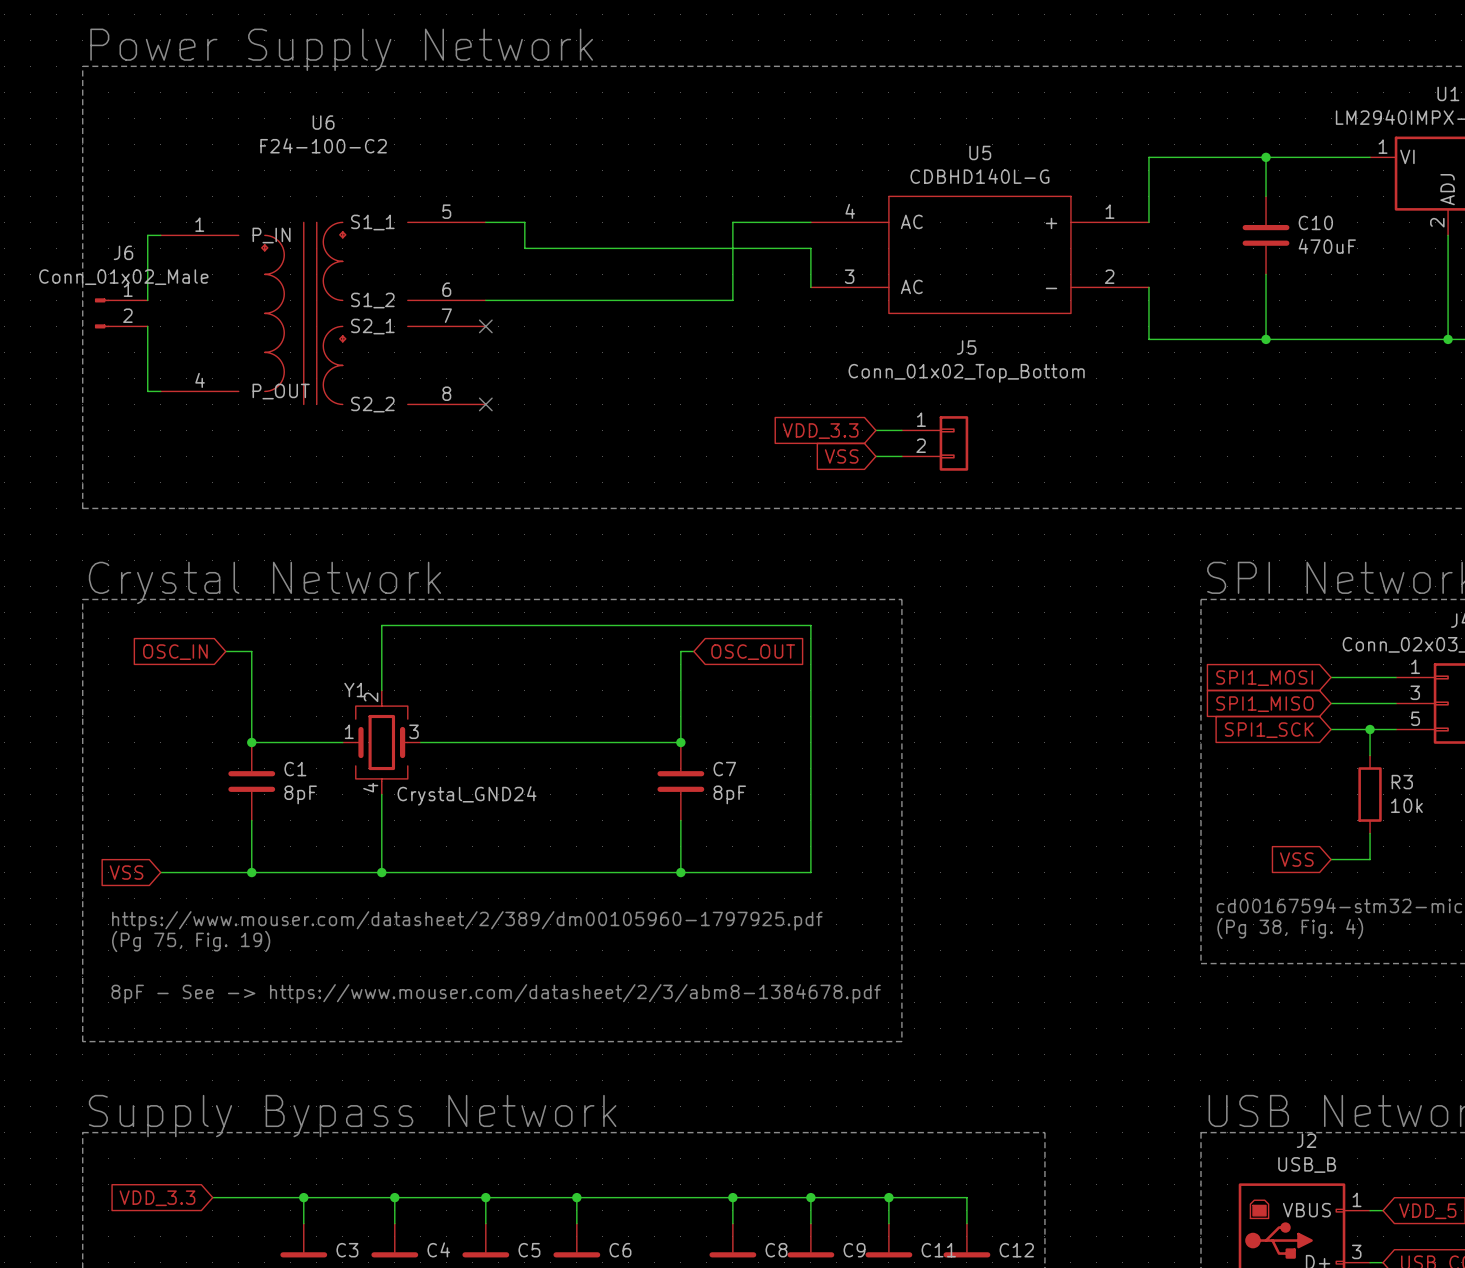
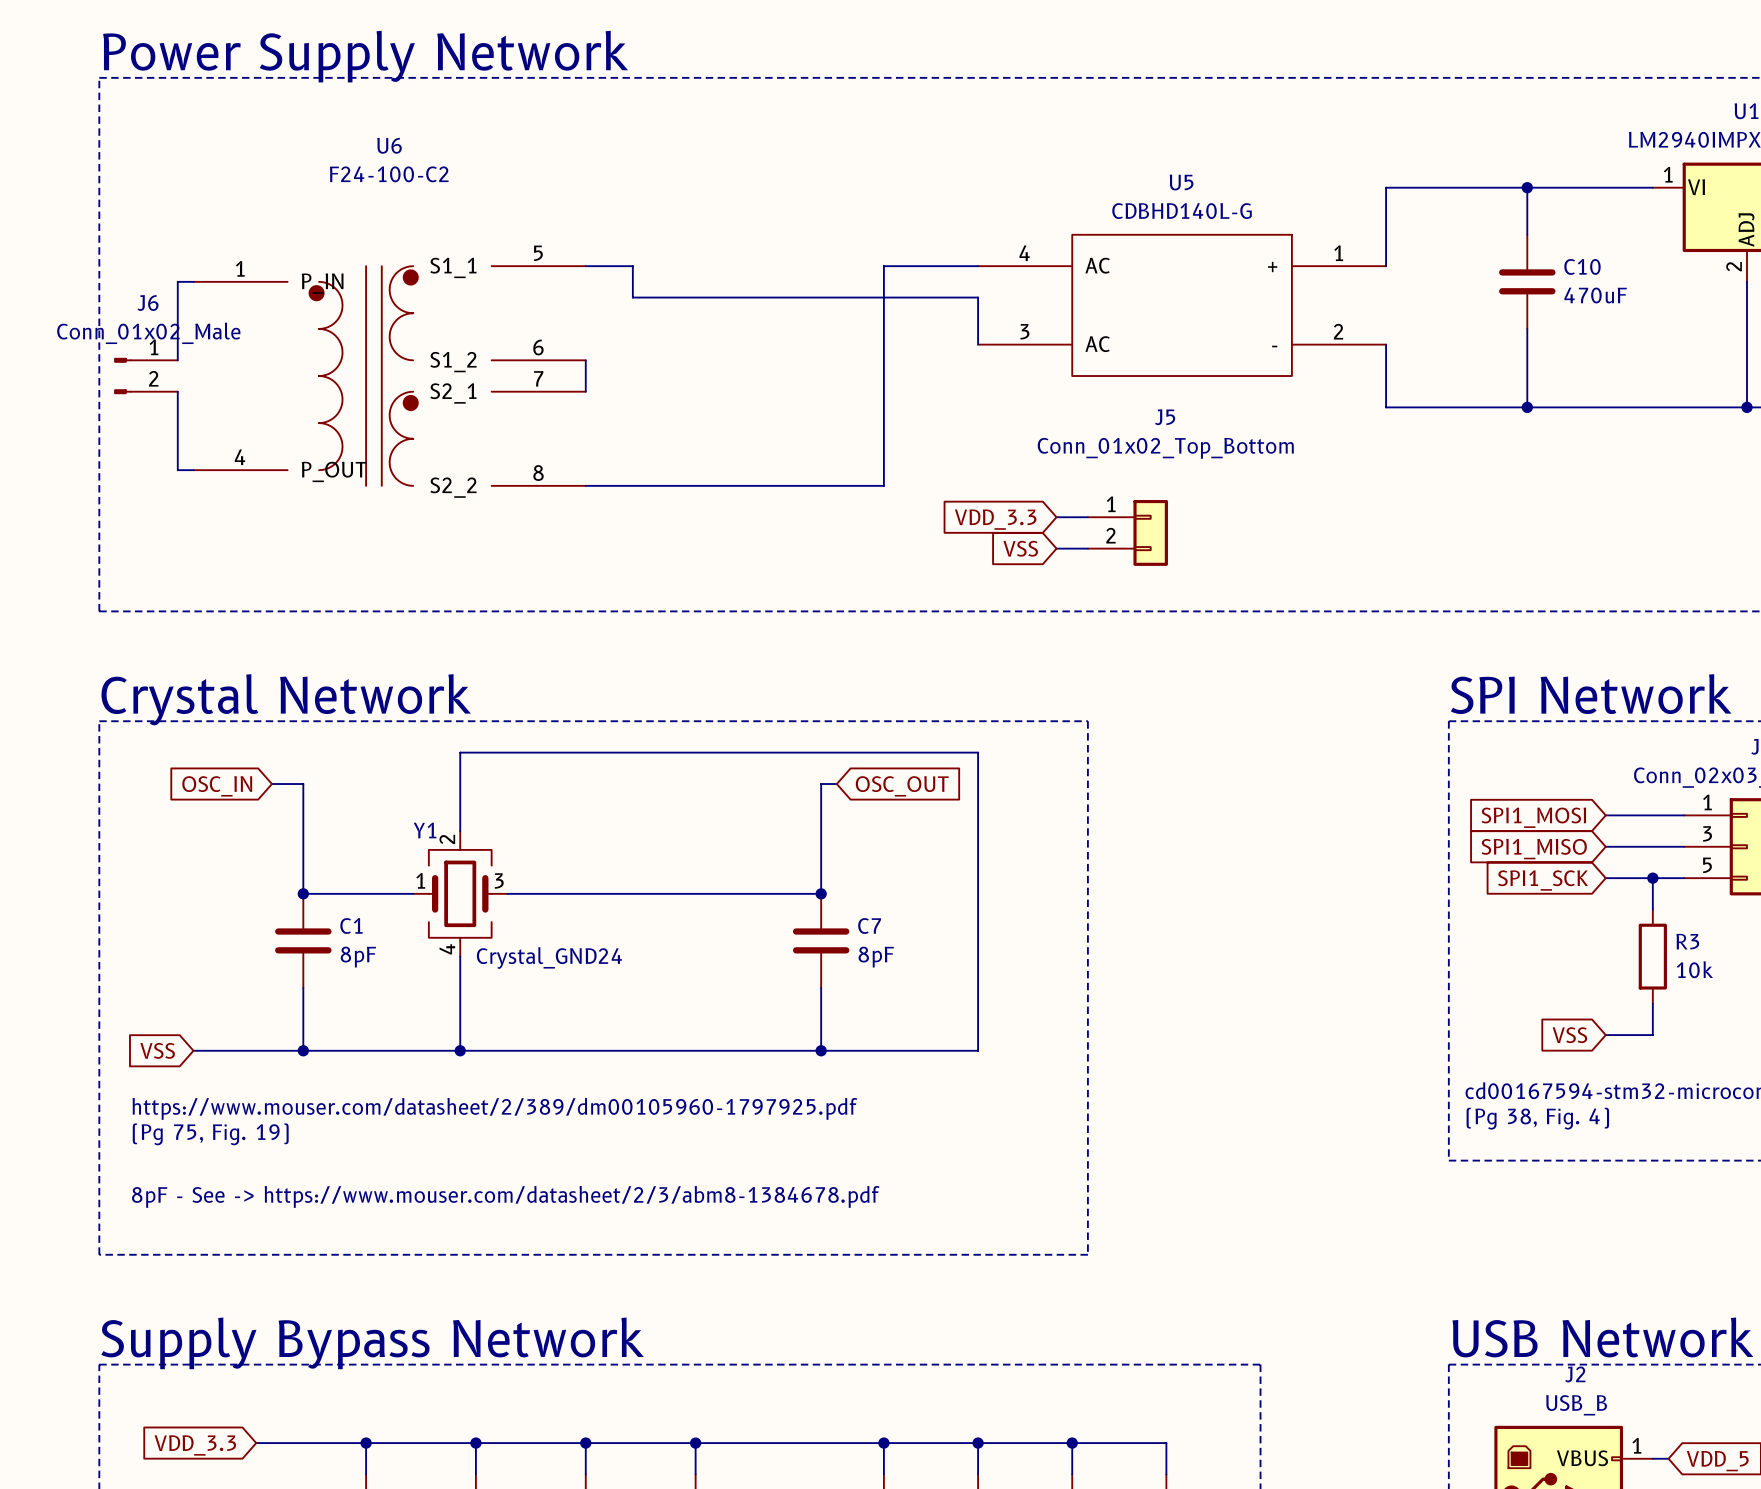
wire: (485, 300) (732, 300) -> (585, 485) (883, 485) (883, 360)
wire: none -> (585, 360) (585, 391)
no-connect mark: (485, 326) -> none
no-connect mark: (485, 404) -> none

